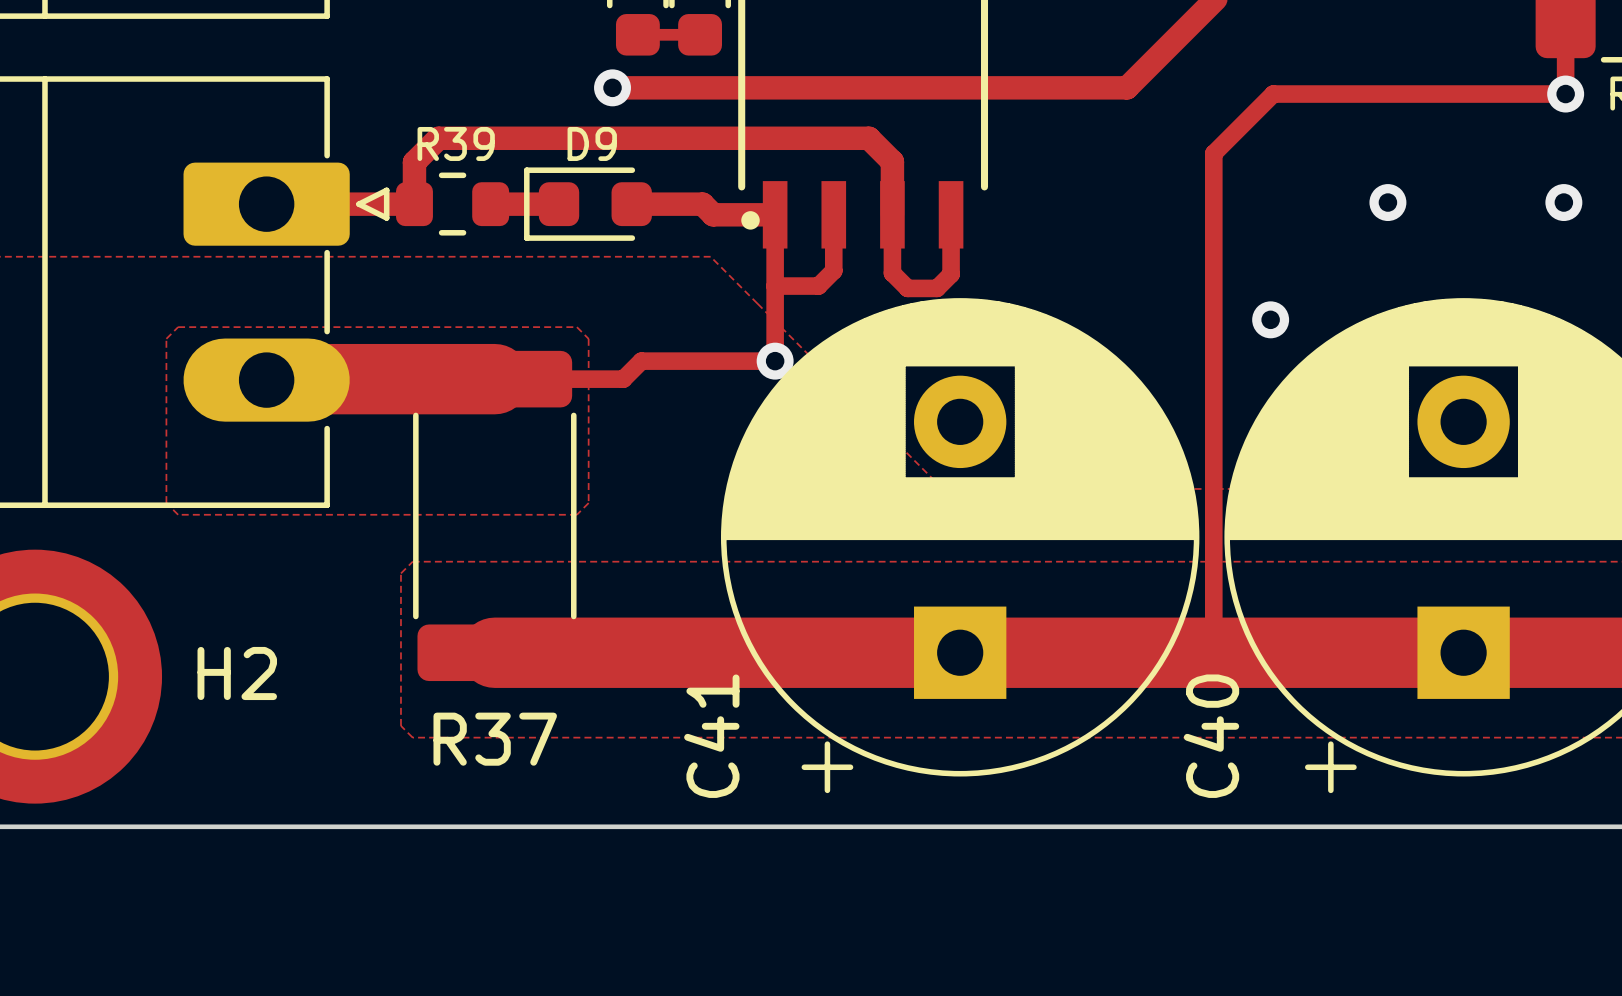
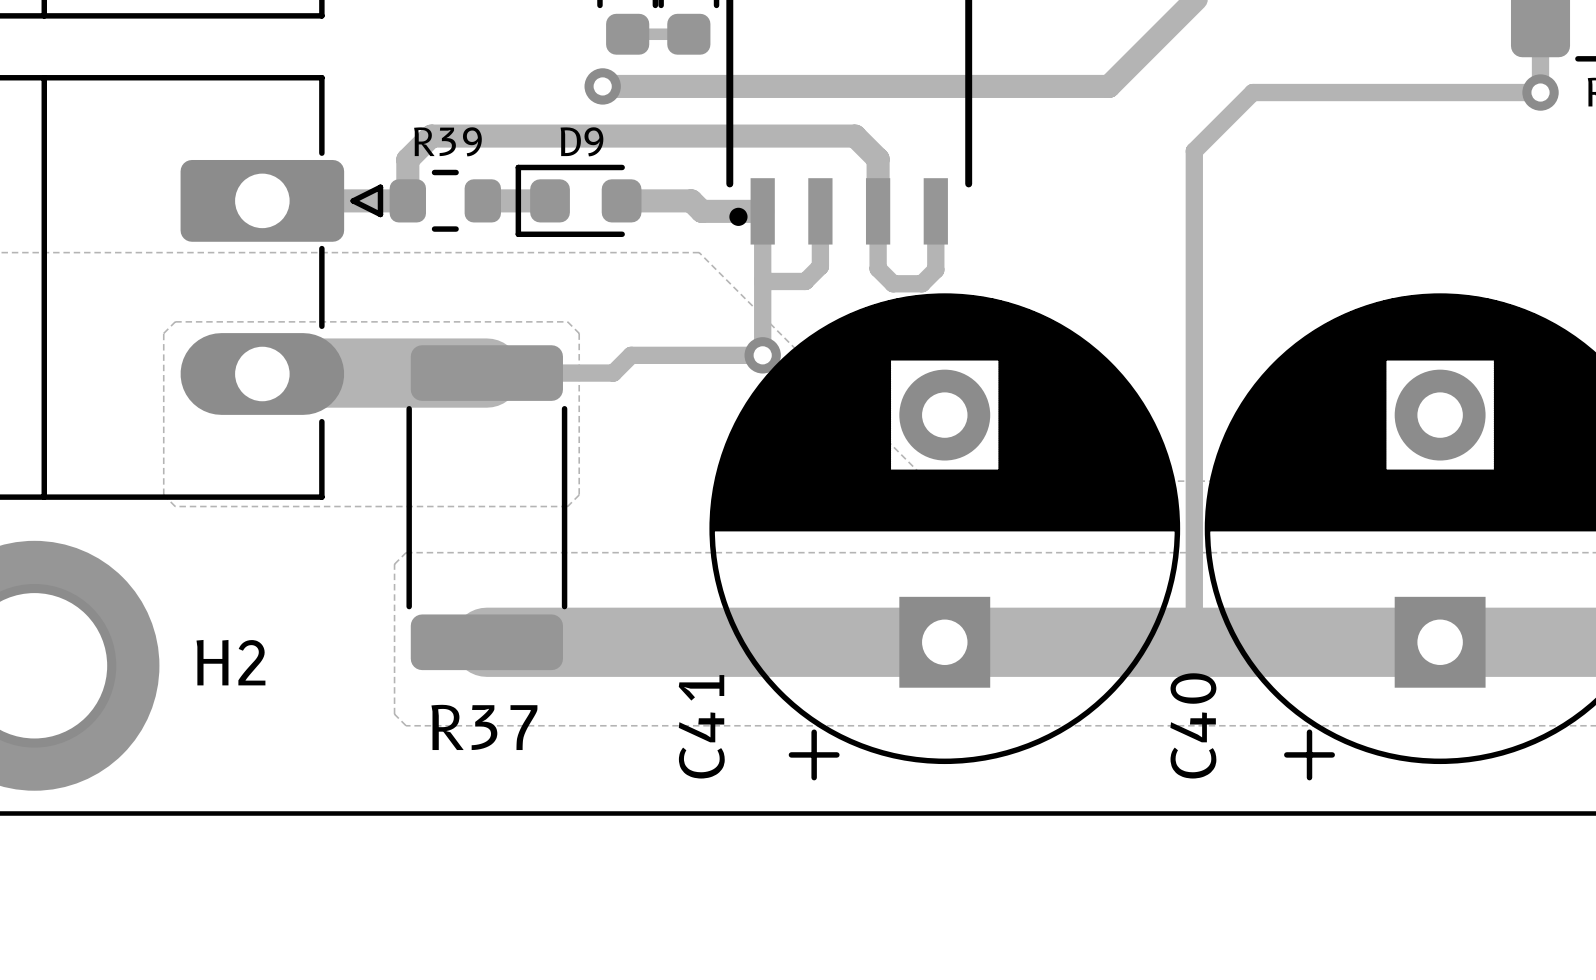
via: (1387, 202) -> none
via: (1563, 202) -> none
via: (1270, 319) -> none

